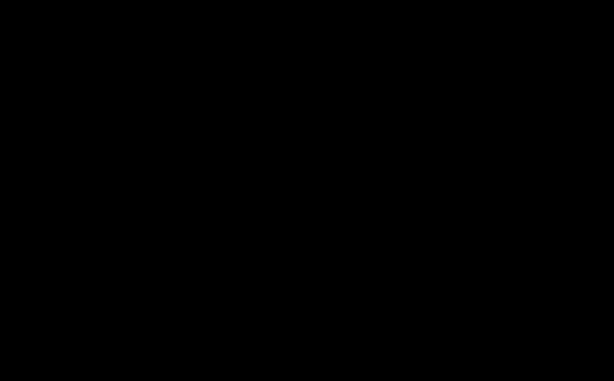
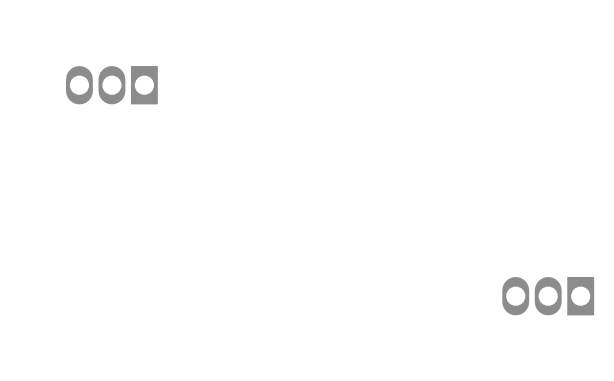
part: none -> (111, 85)
part: none -> (548, 296)

